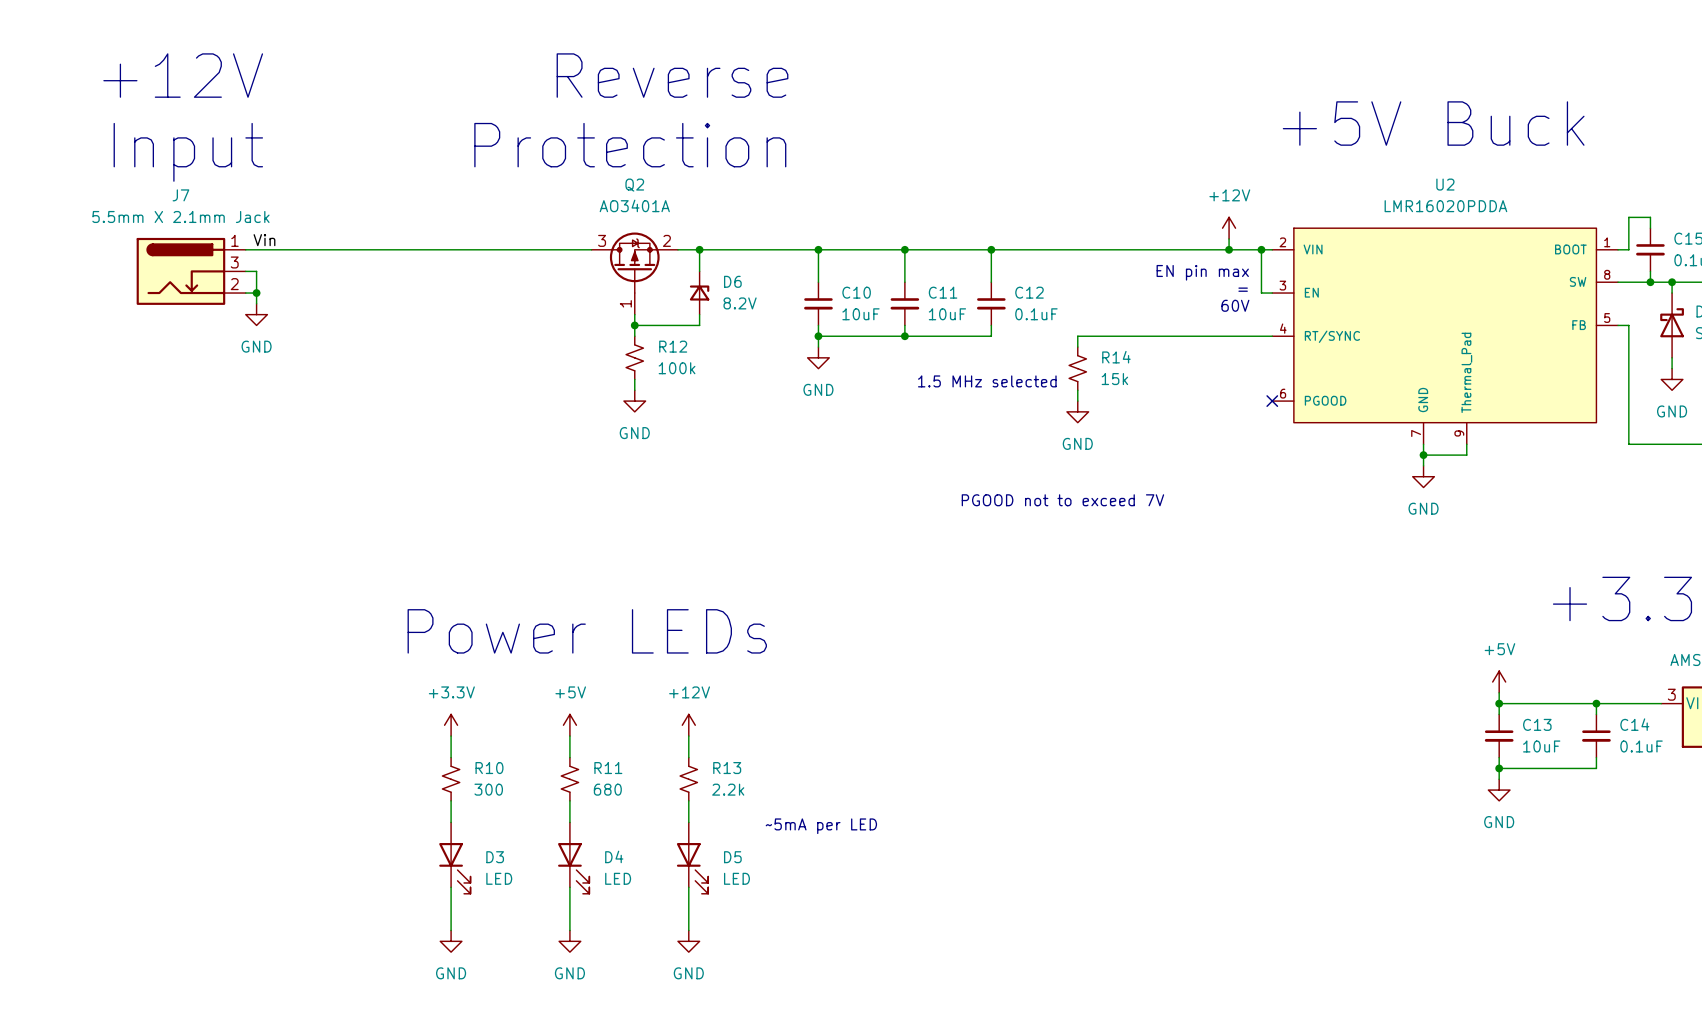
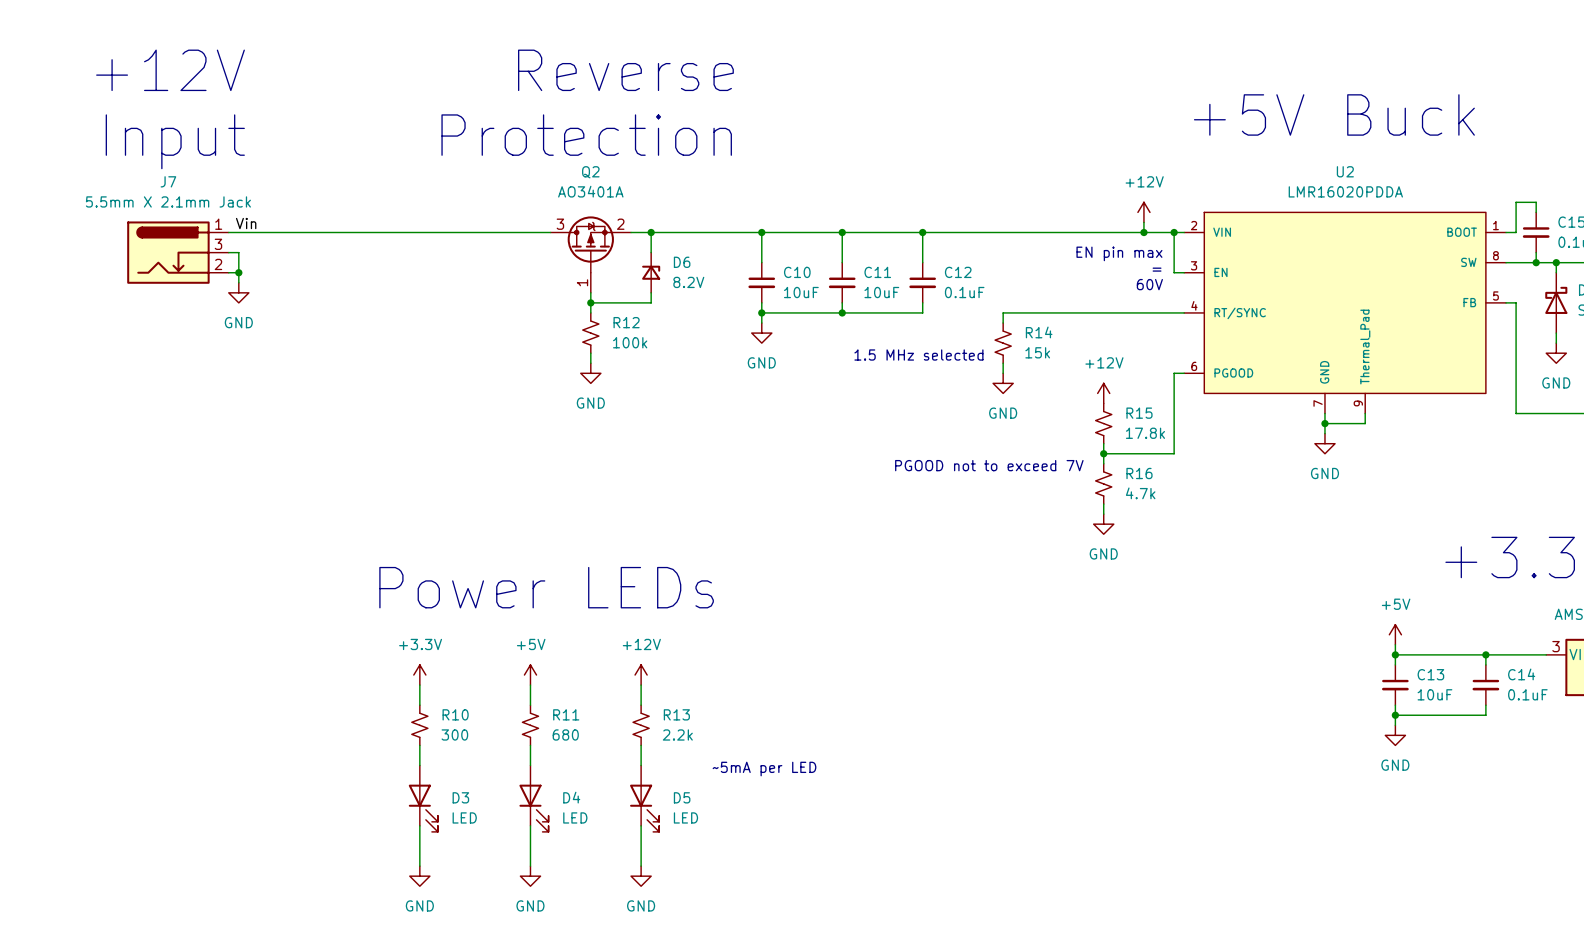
wire: none -> (1184, 373) (1174, 373) (1174, 453) (1103, 453)
no-connect mark: (1272, 401) -> none
power symbol: none -> +12V (1103, 393)
R15: none -> 17.8k (1103, 423)
wire: none -> (1103, 443) (1103, 463)
junction: none -> (1103, 453)
R16: none -> 4.7k (1103, 483)
wire: none -> (1103, 504) (1103, 514)
power symbol: none -> GND (1103, 524)

